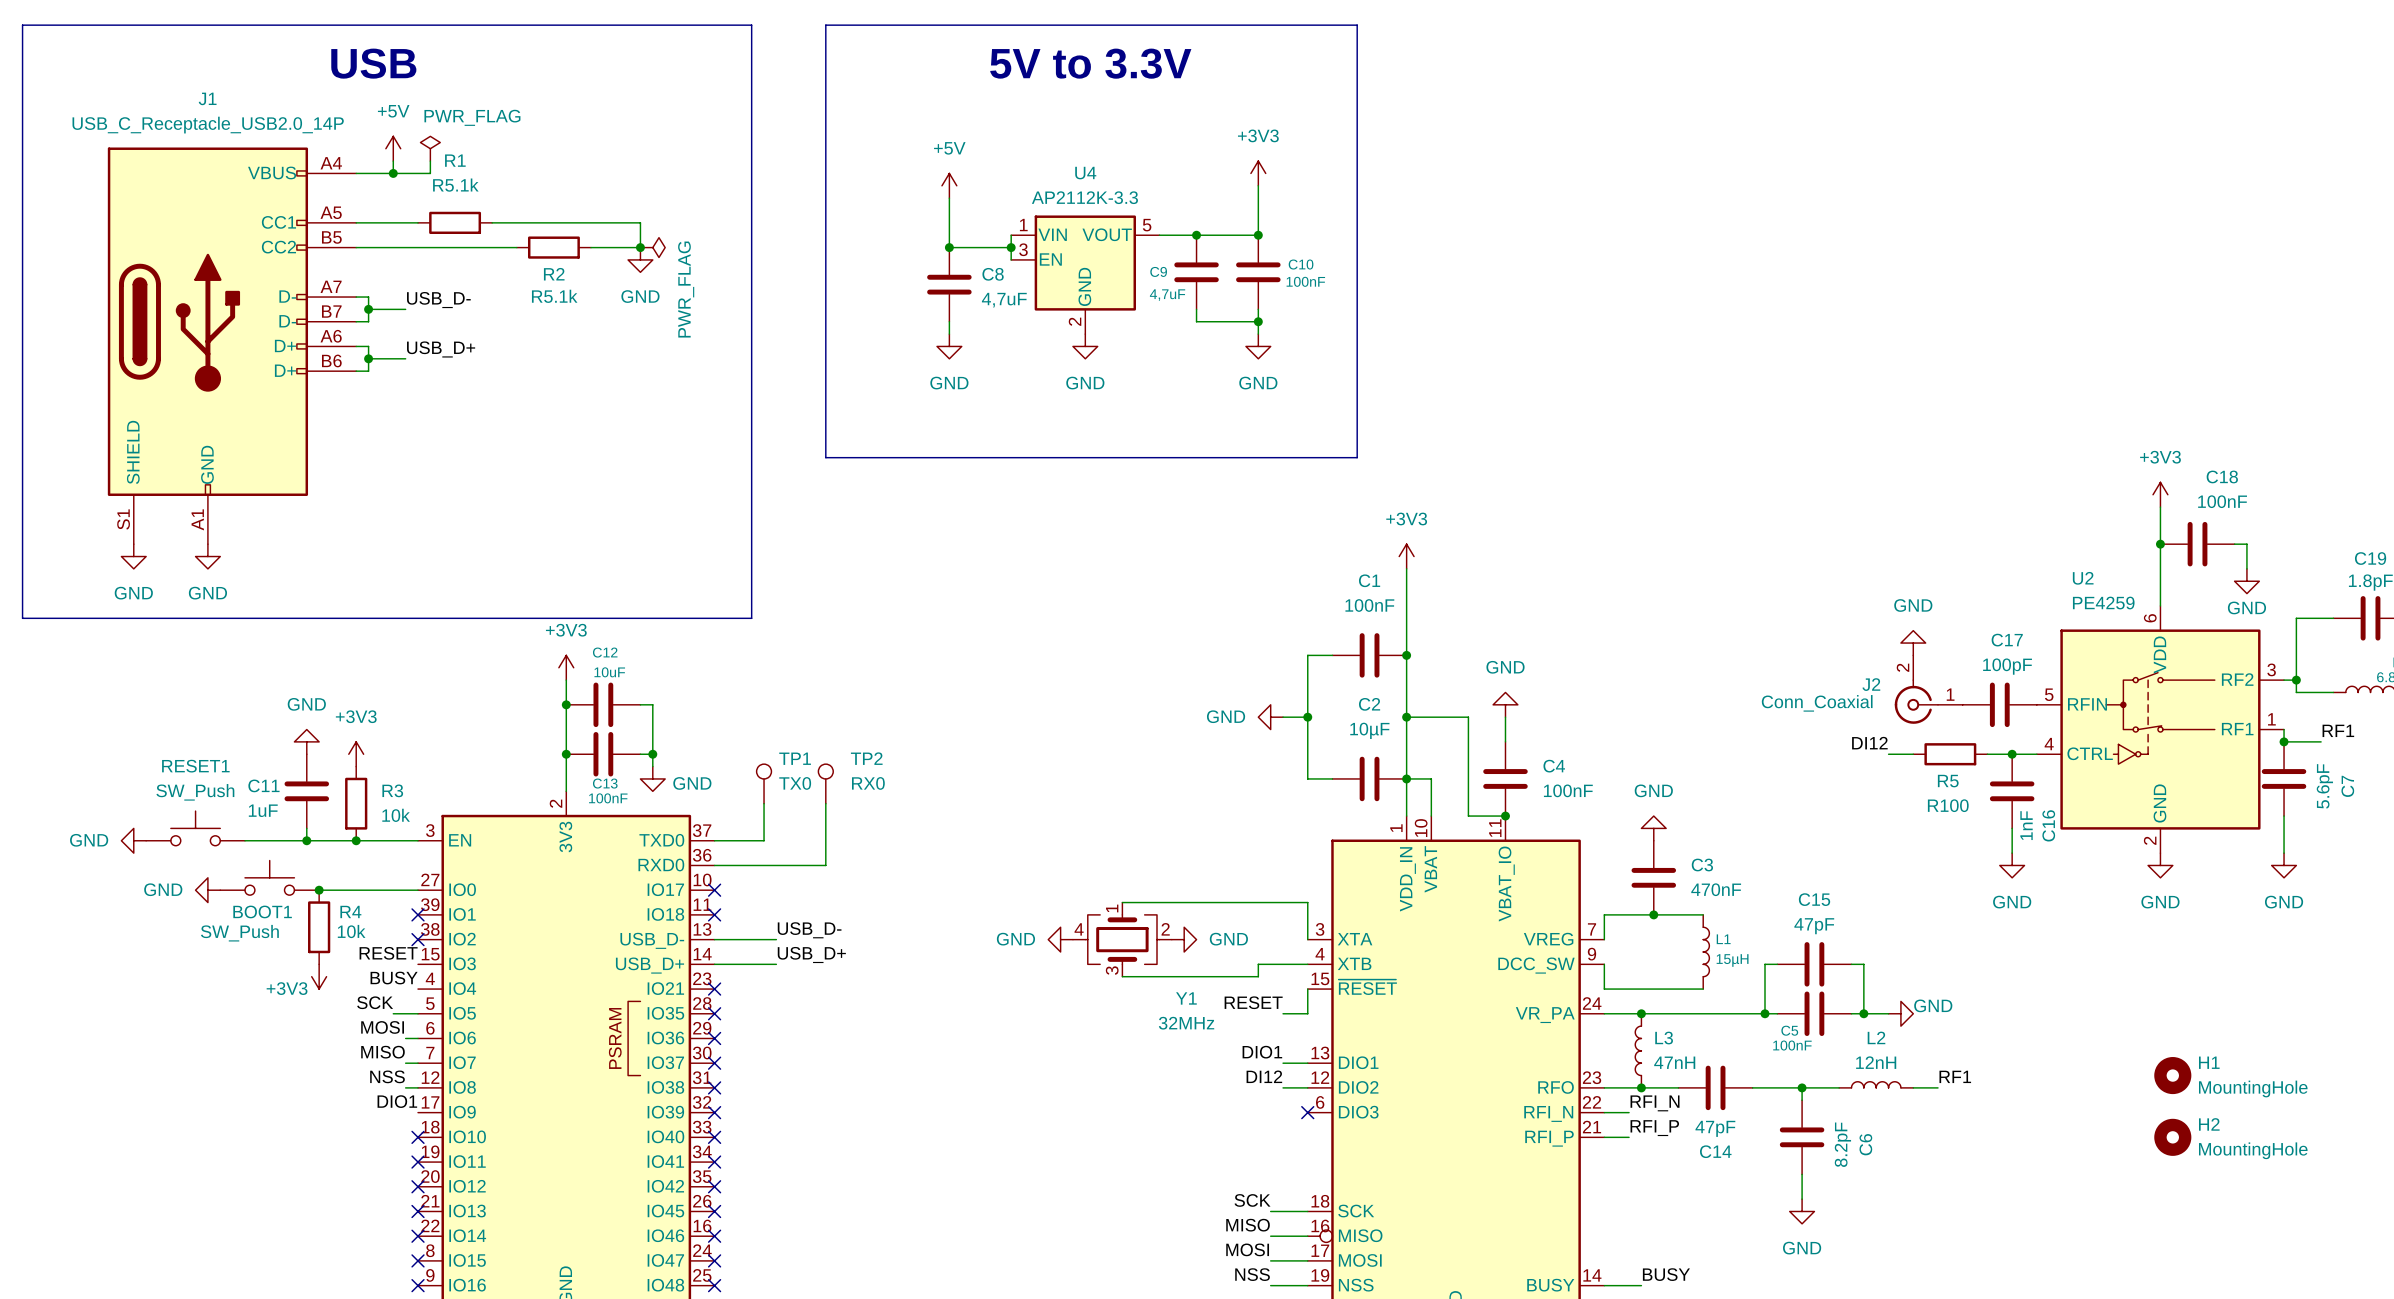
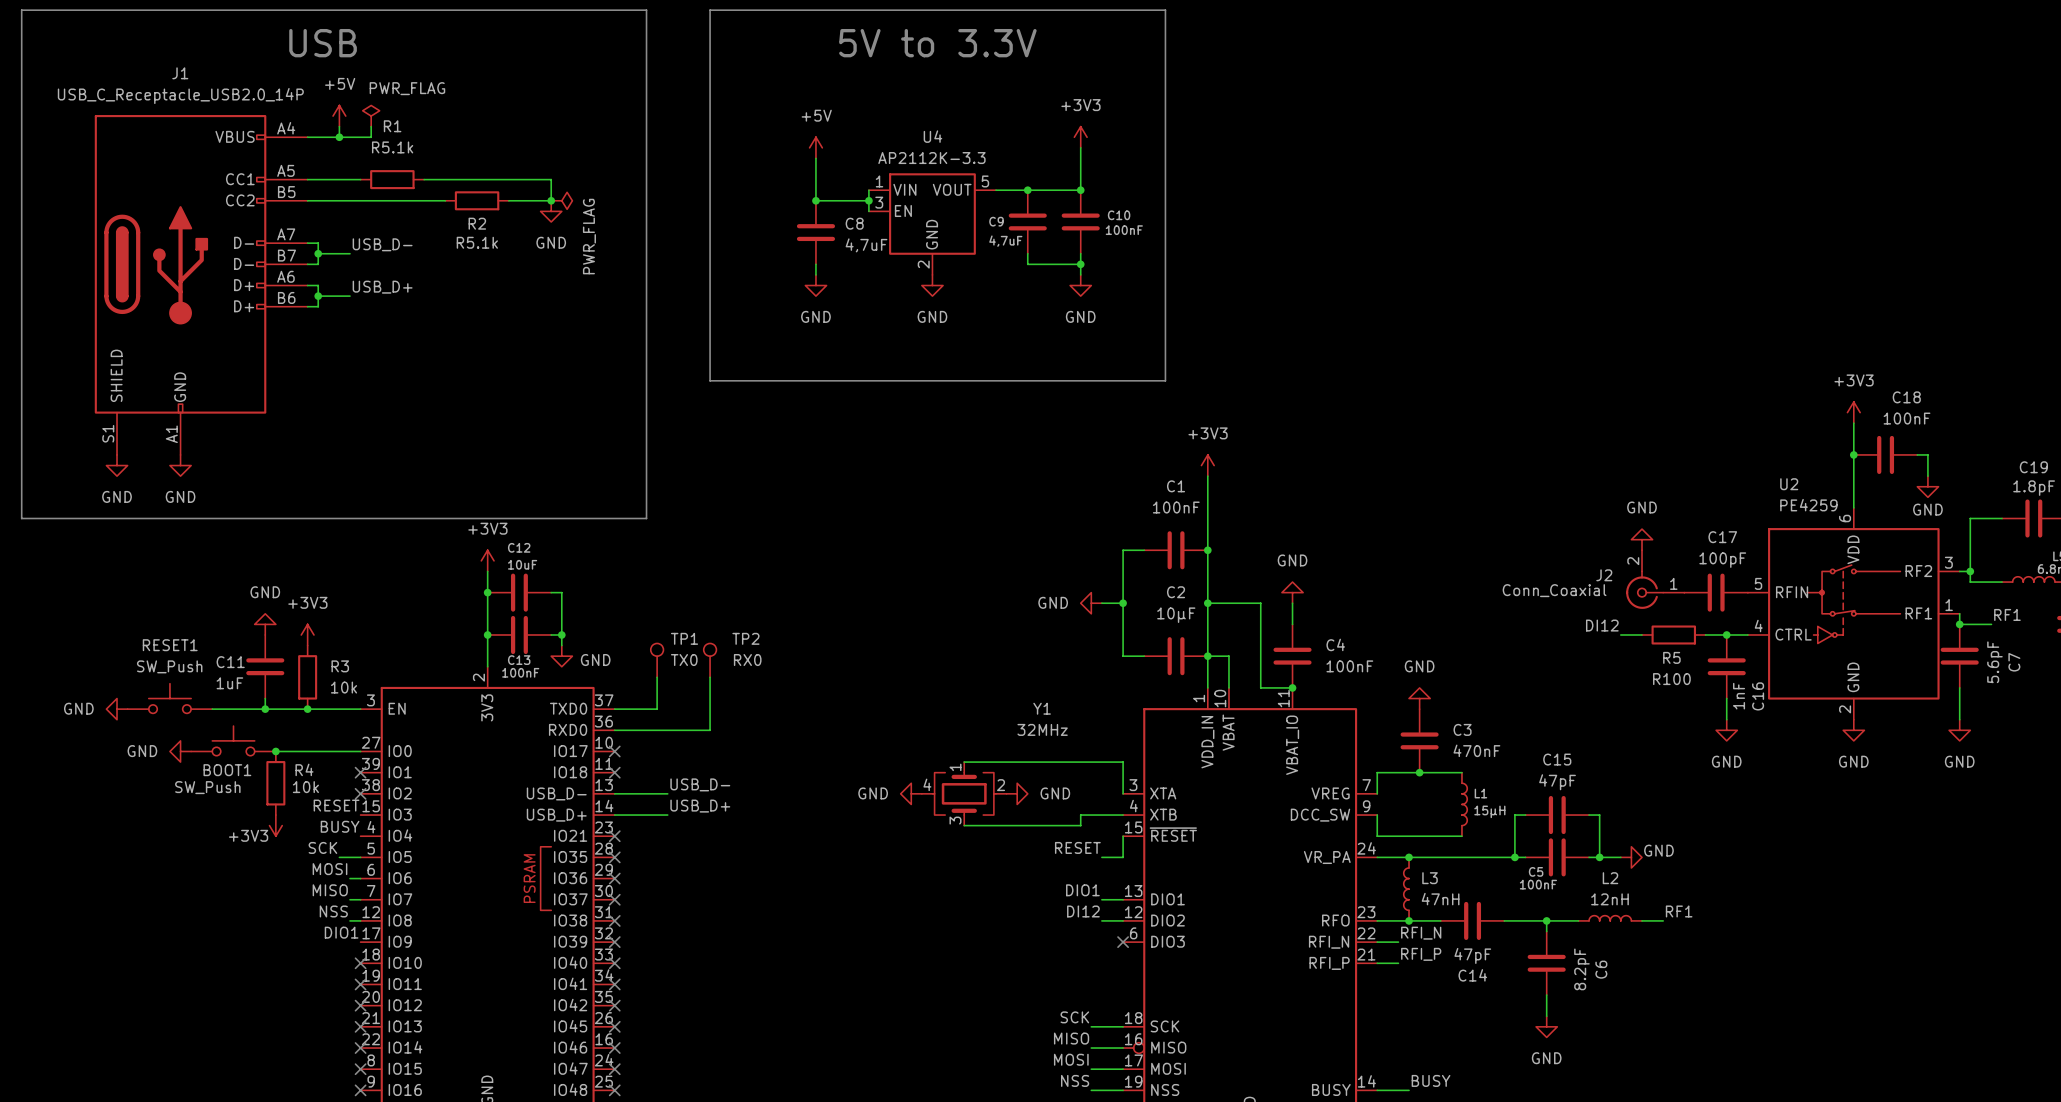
Y1 name position: Y1 (1186, 998) -> Y1 (1042, 708)
Y1 value position: 32MHz (1186, 1023) -> 32MHz (1042, 729)
H1: MountingHole (2172, 1075) -> none
H2: MountingHole (2172, 1137) -> none

